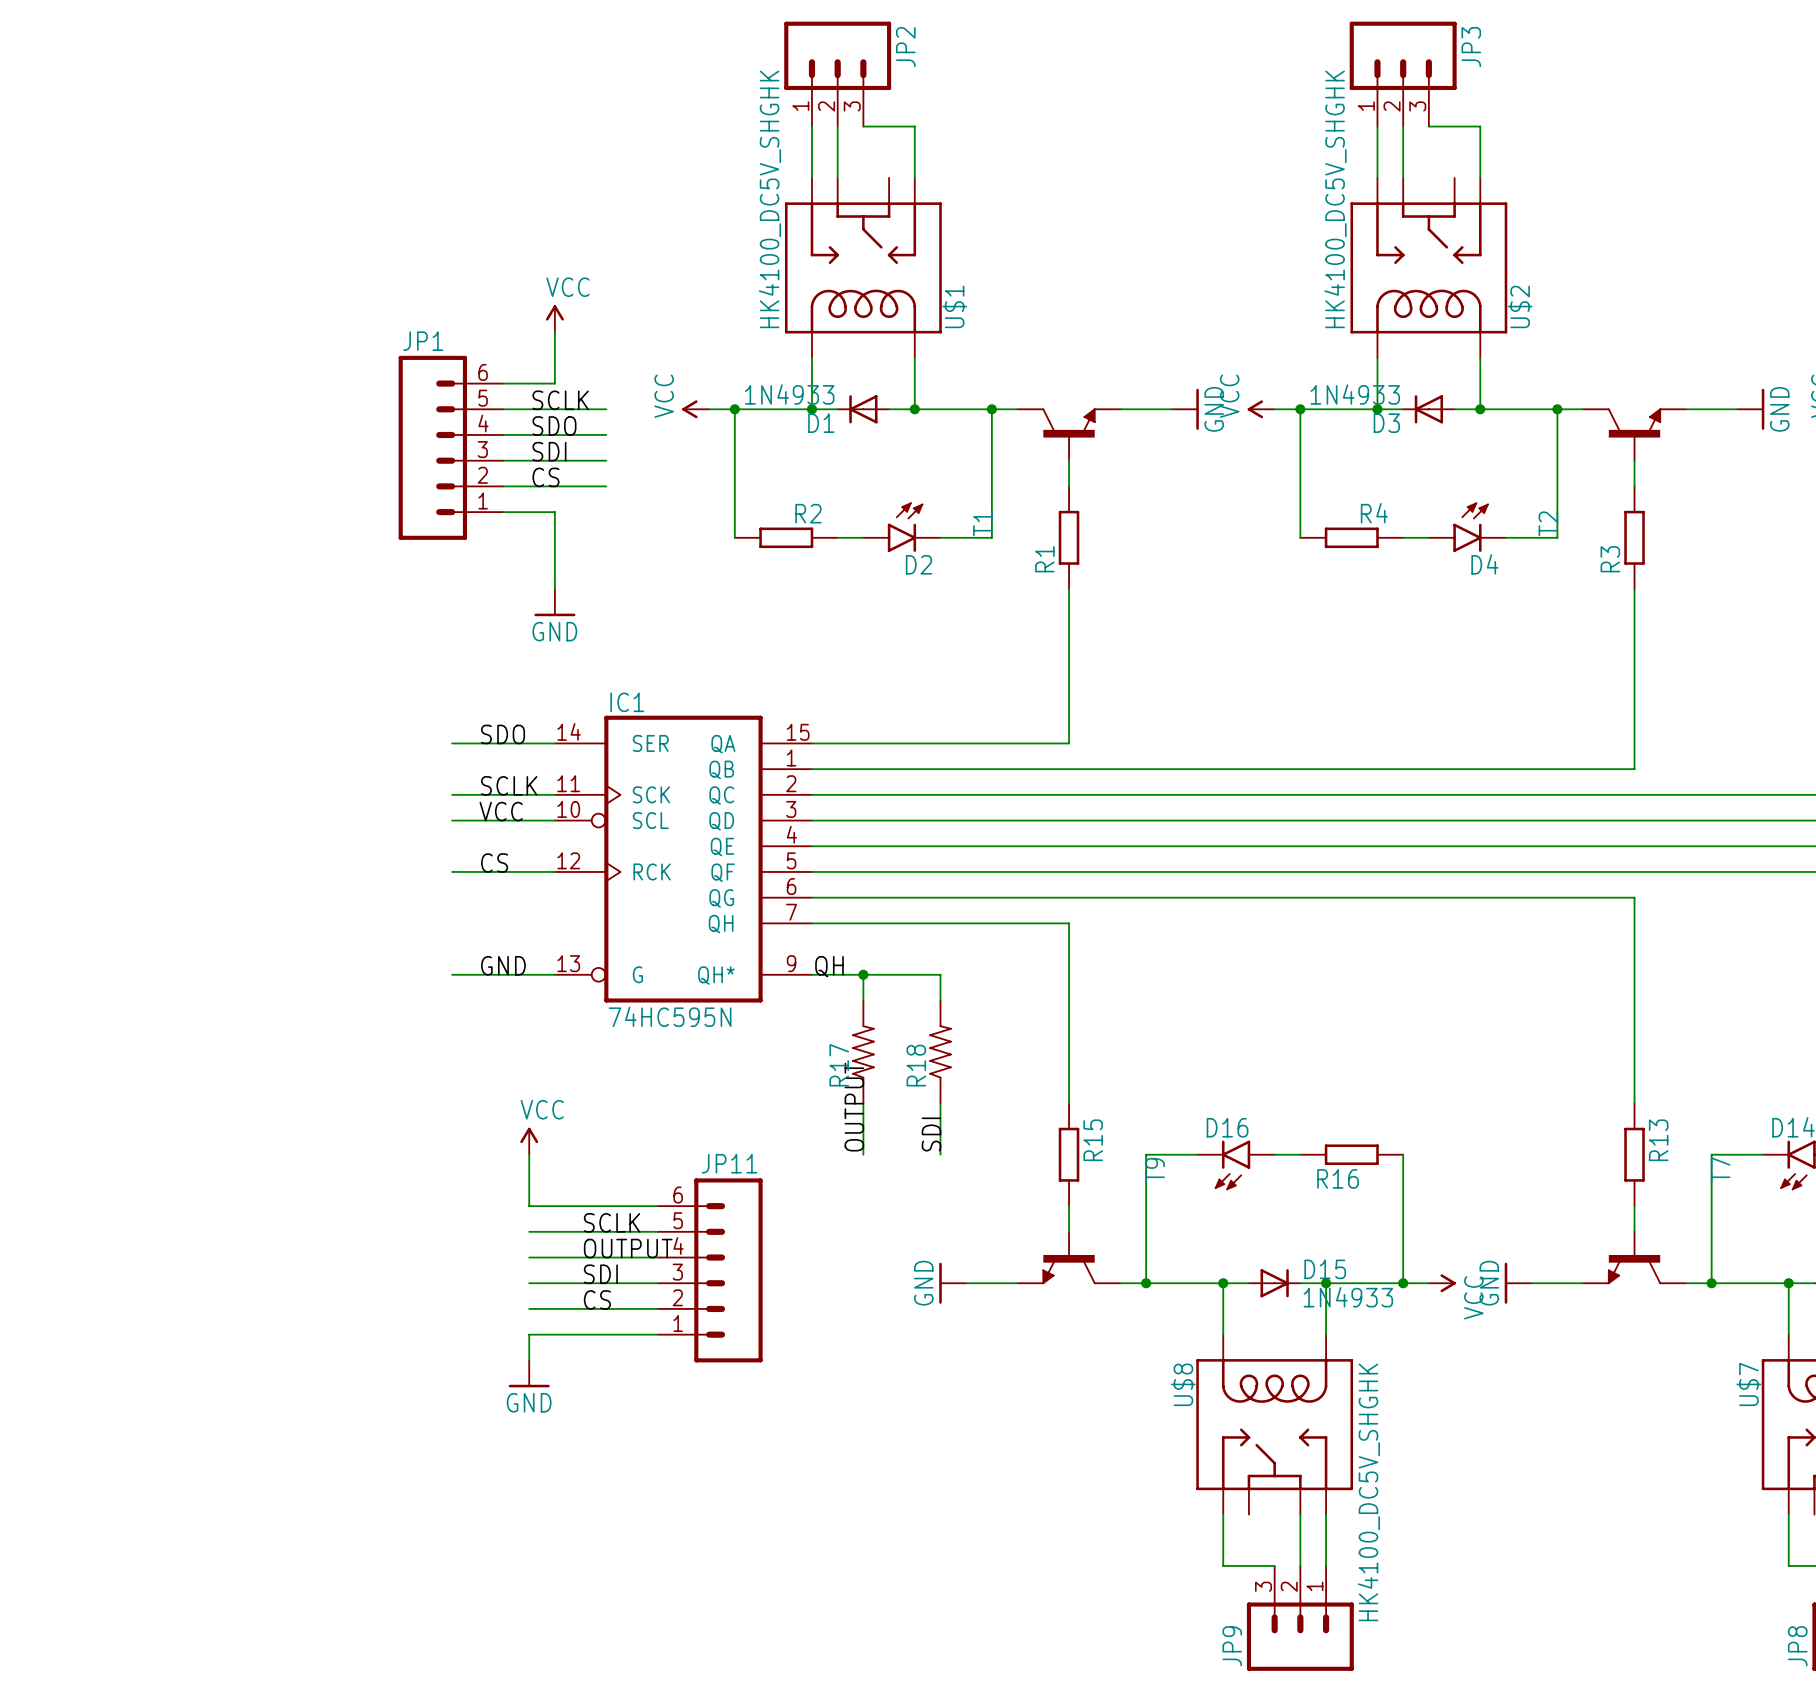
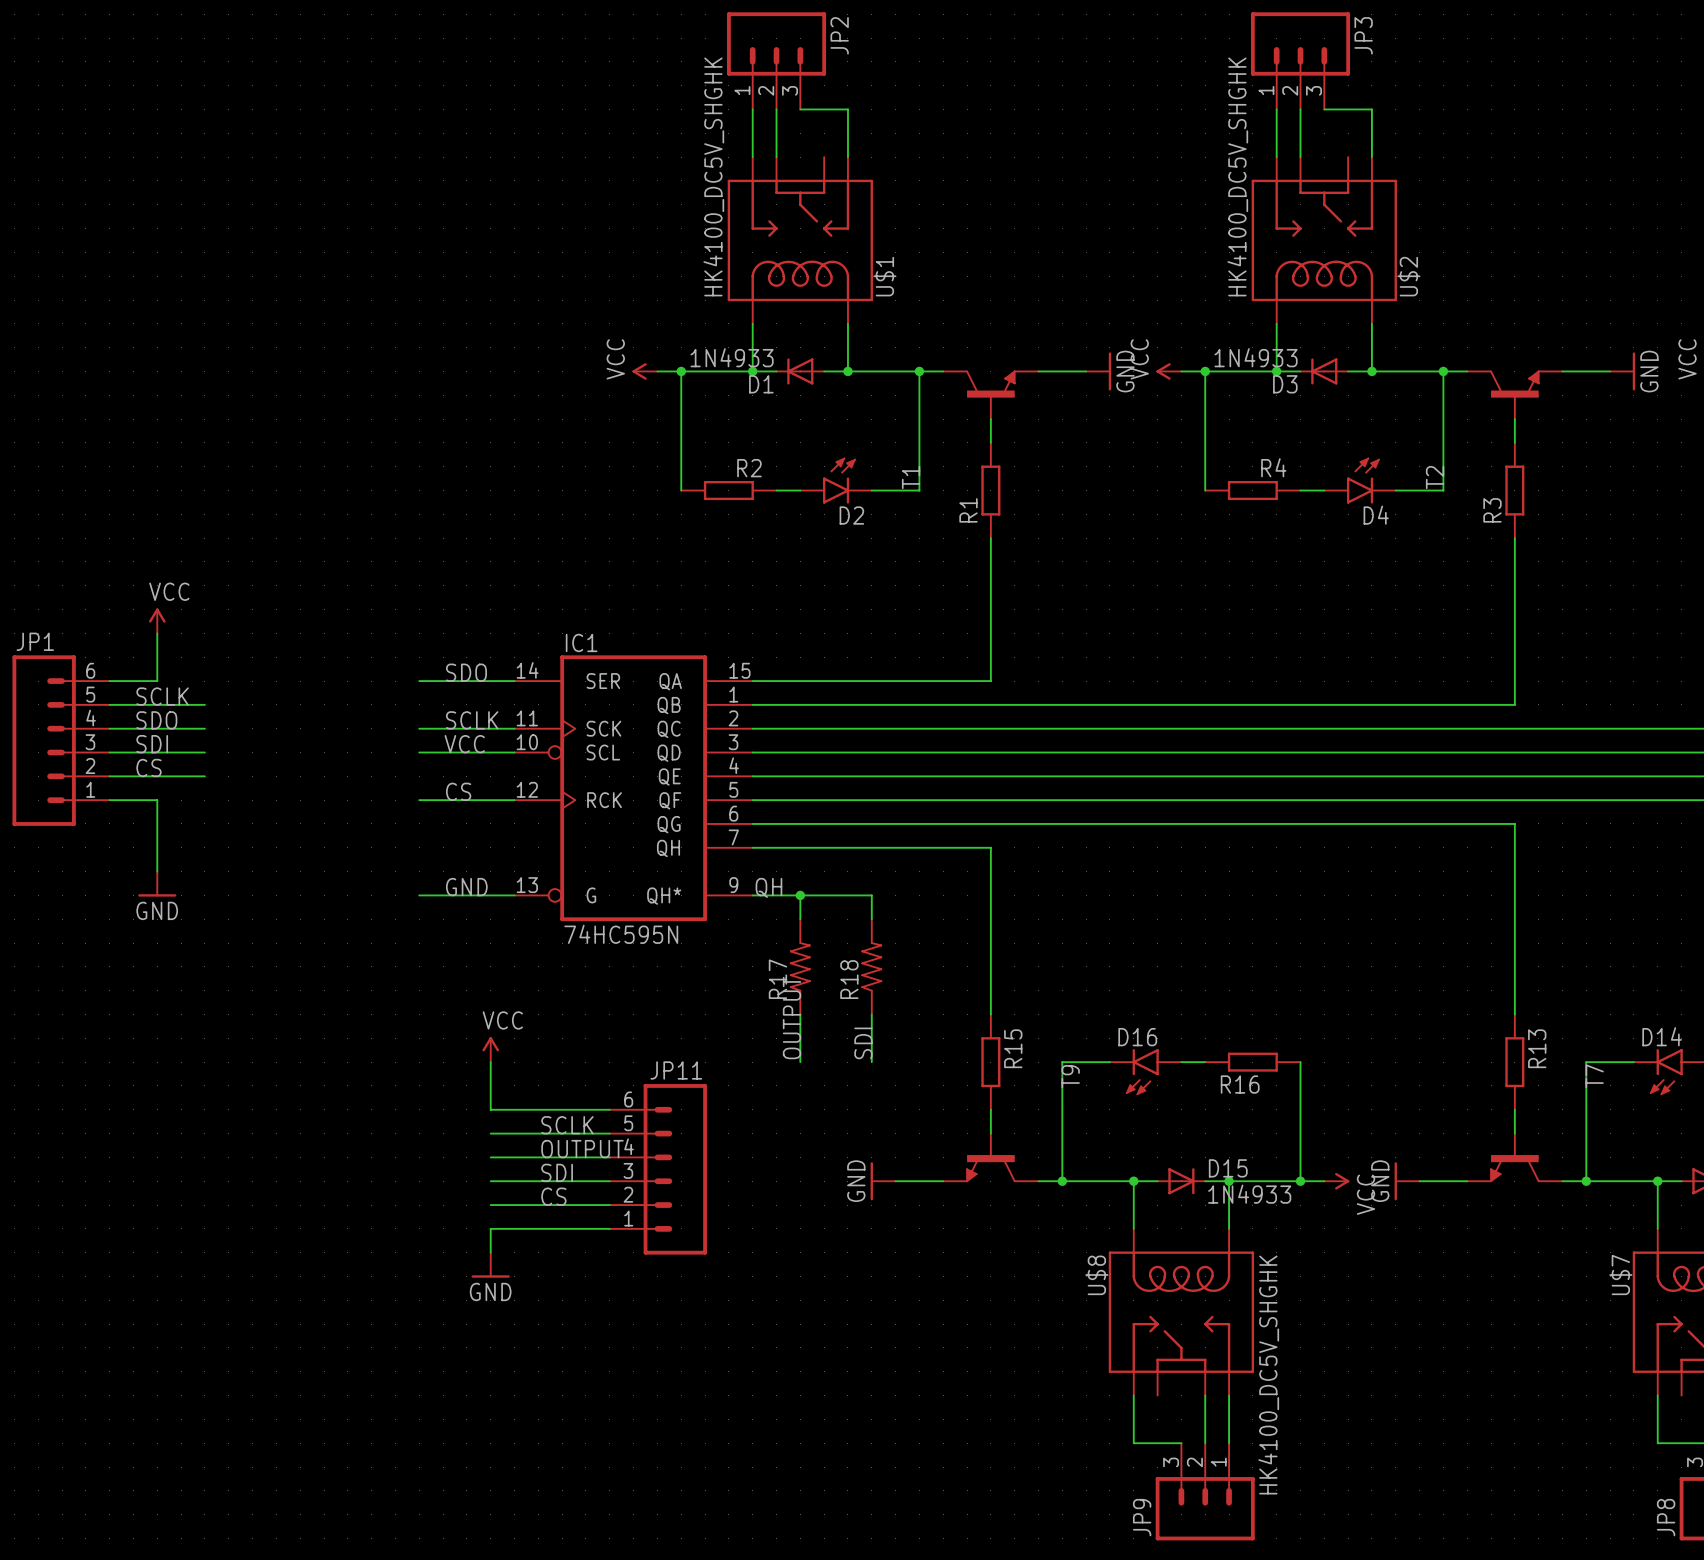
power symbol: VCC (554, 318) -> none
wire: (554, 332) (554, 383) (503, 383) -> none
label: SCLK (560, 400) -> none
wire: (503, 409) (606, 409) -> none
label: SDO (554, 426) -> none
wire: (503, 434) (606, 434) -> none
JP1 position: (451, 447) -> (61, 740)
label: SDI (549, 451) -> none
wire: (503, 460) (606, 460) -> none
label: CS (545, 477) -> none
wire: (503, 486) (606, 486) -> none
wire: (503, 512) (554, 512) (554, 589) -> none
power symbol: GND (554, 602) -> none
power symbol: none -> VCC (157, 620)
wire: none -> (157, 633) (157, 681) (109, 681)
label: none -> SCLK (162, 696)
wire: none -> (109, 704) (204, 704)
label: none -> SDO (156, 720)
wire: none -> (109, 728) (204, 728)
label: none -> SDI (152, 744)
wire: none -> (109, 752) (204, 752)
label: none -> CS (148, 768)
wire: none -> (109, 776) (204, 776)
wire: none -> (109, 800) (157, 800) (157, 871)
power symbol: none -> GND (157, 884)

